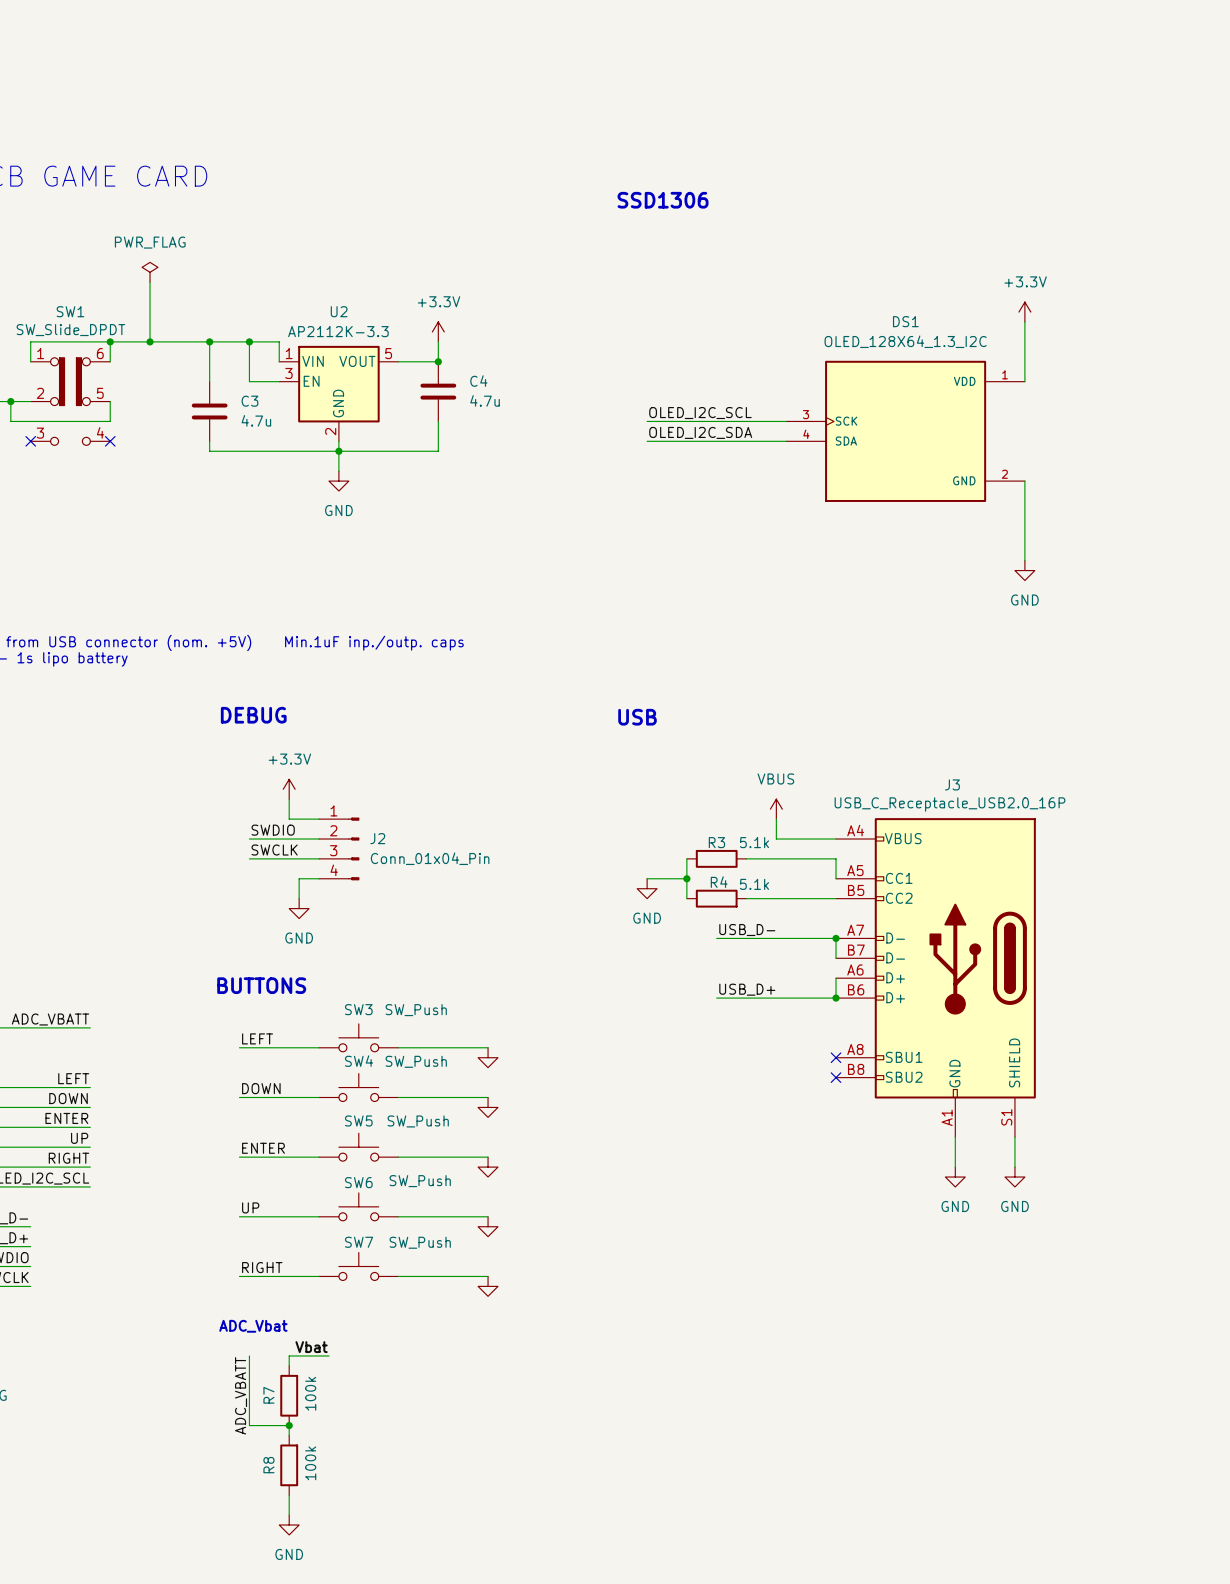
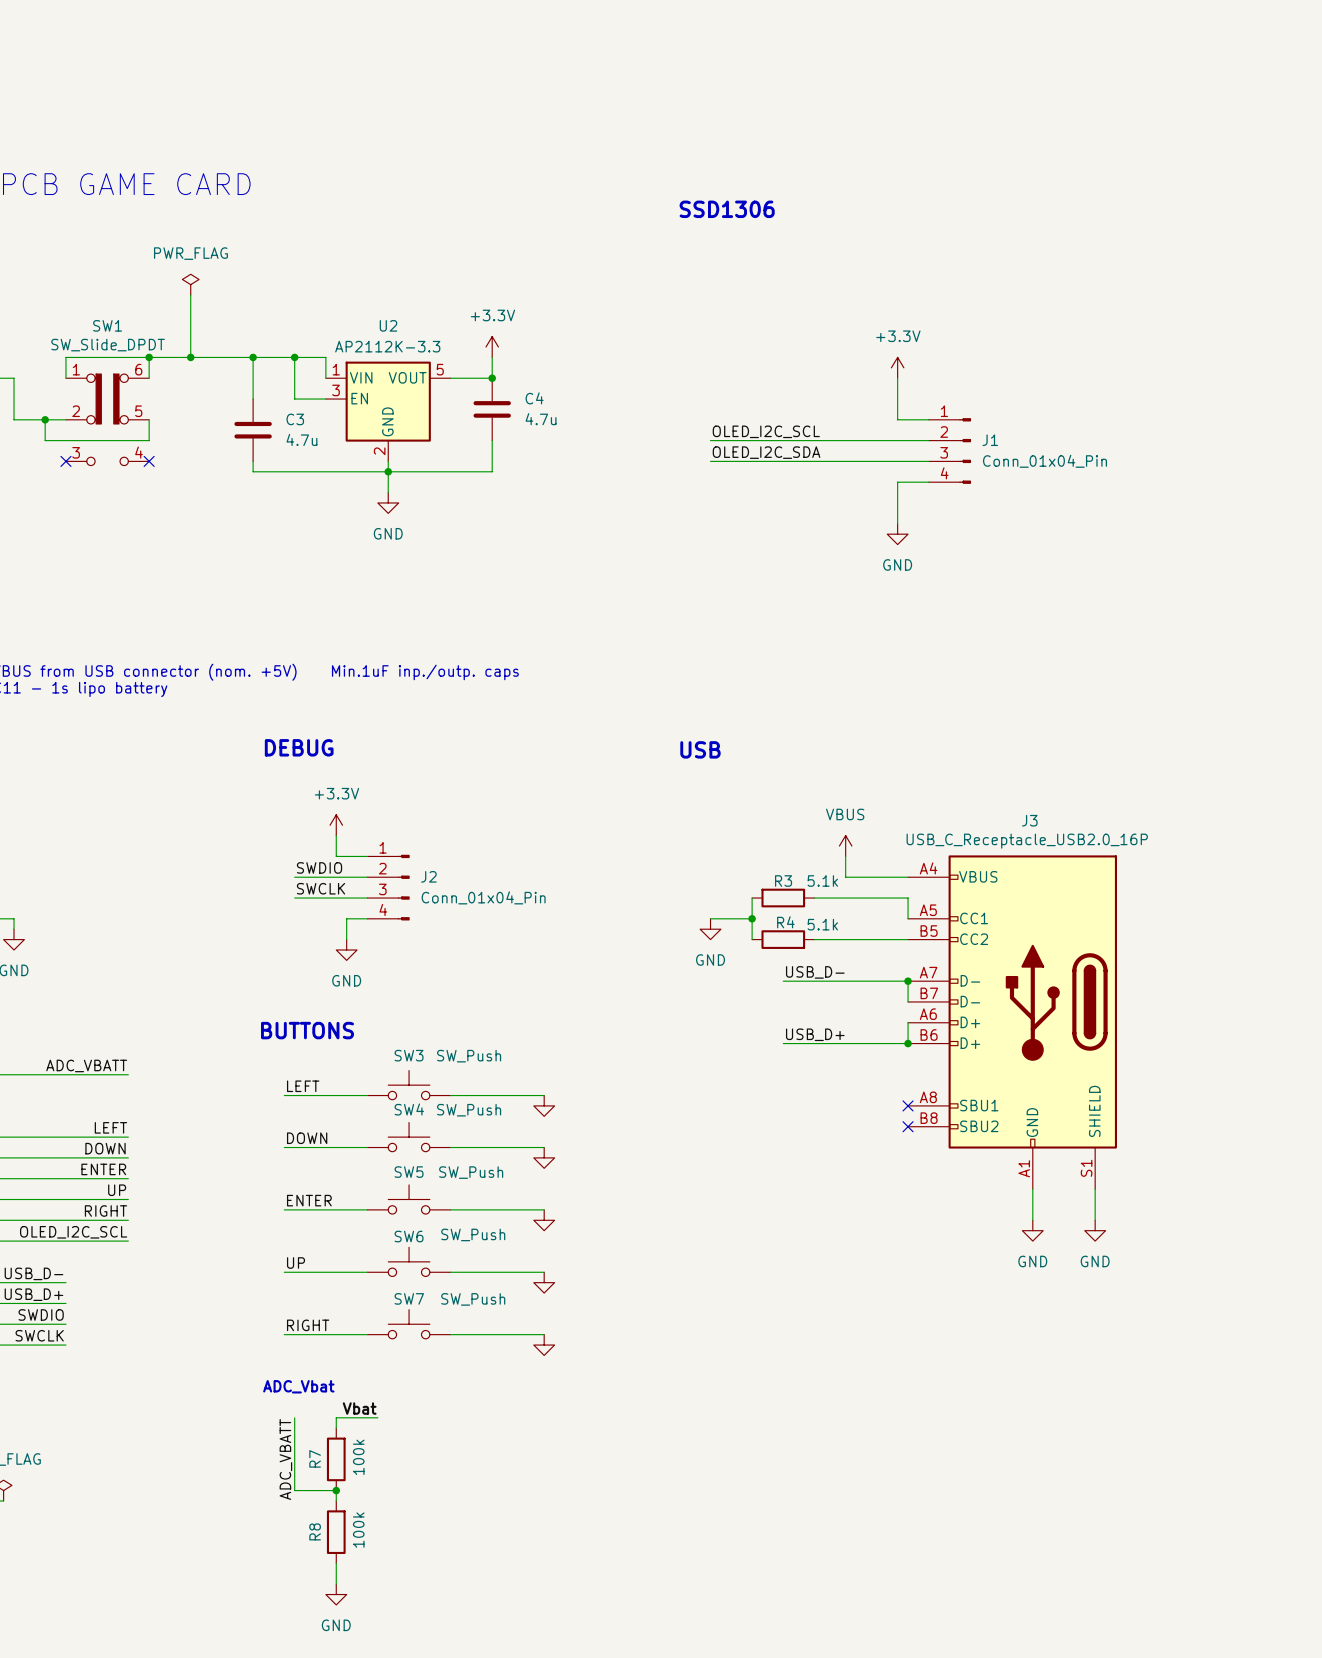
power symbol: +3.3V (1024, 312) -> none
wire: (1024, 322) (1024, 381) -> none
power symbol: none -> +3.3V (897, 367)
J1: none -> Conn_01x04_Pin (949, 451)
DS1: OLED_128X64_1.3_I2C (905, 431) -> none
wire: (1024, 481) (1024, 560) -> none
power symbol: none -> GND (897, 534)
power symbol: GND (1024, 570) -> none

